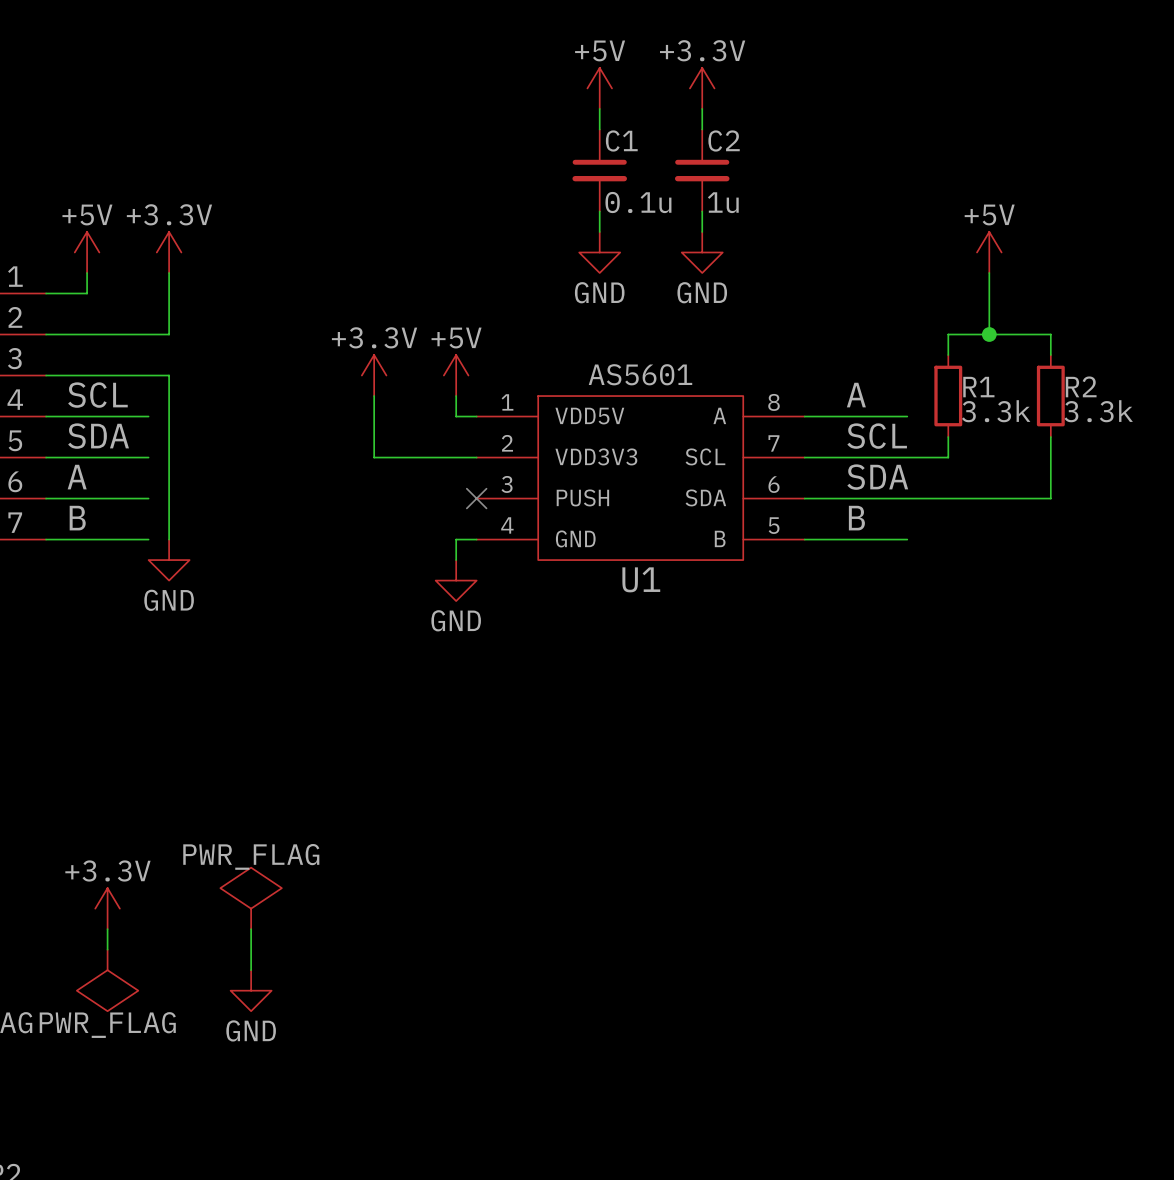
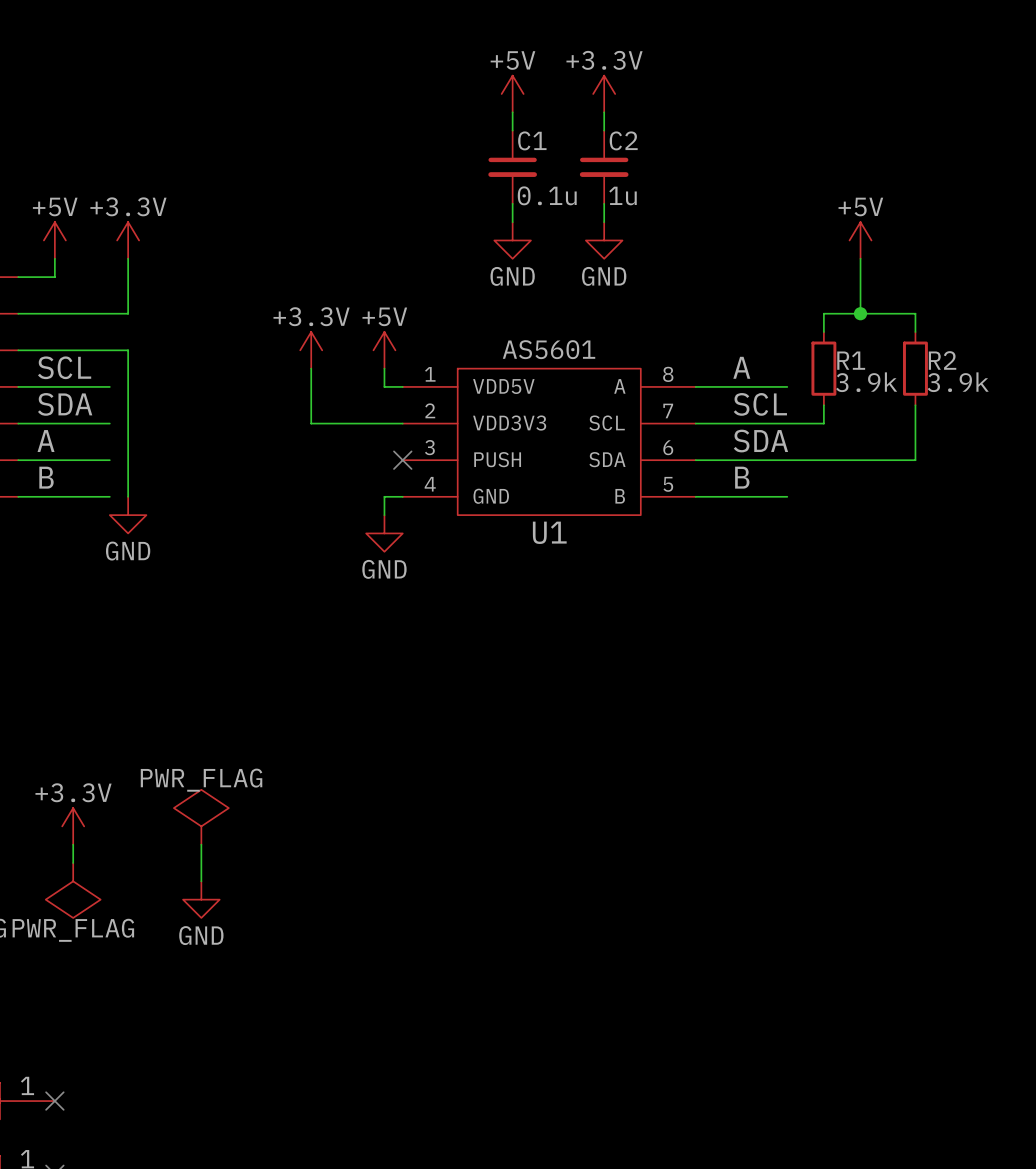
R1 value: 3.3k (996, 411) -> 3.9k (866, 382)
R2 value: 3.3k (1098, 411) -> 3.9k (958, 382)

